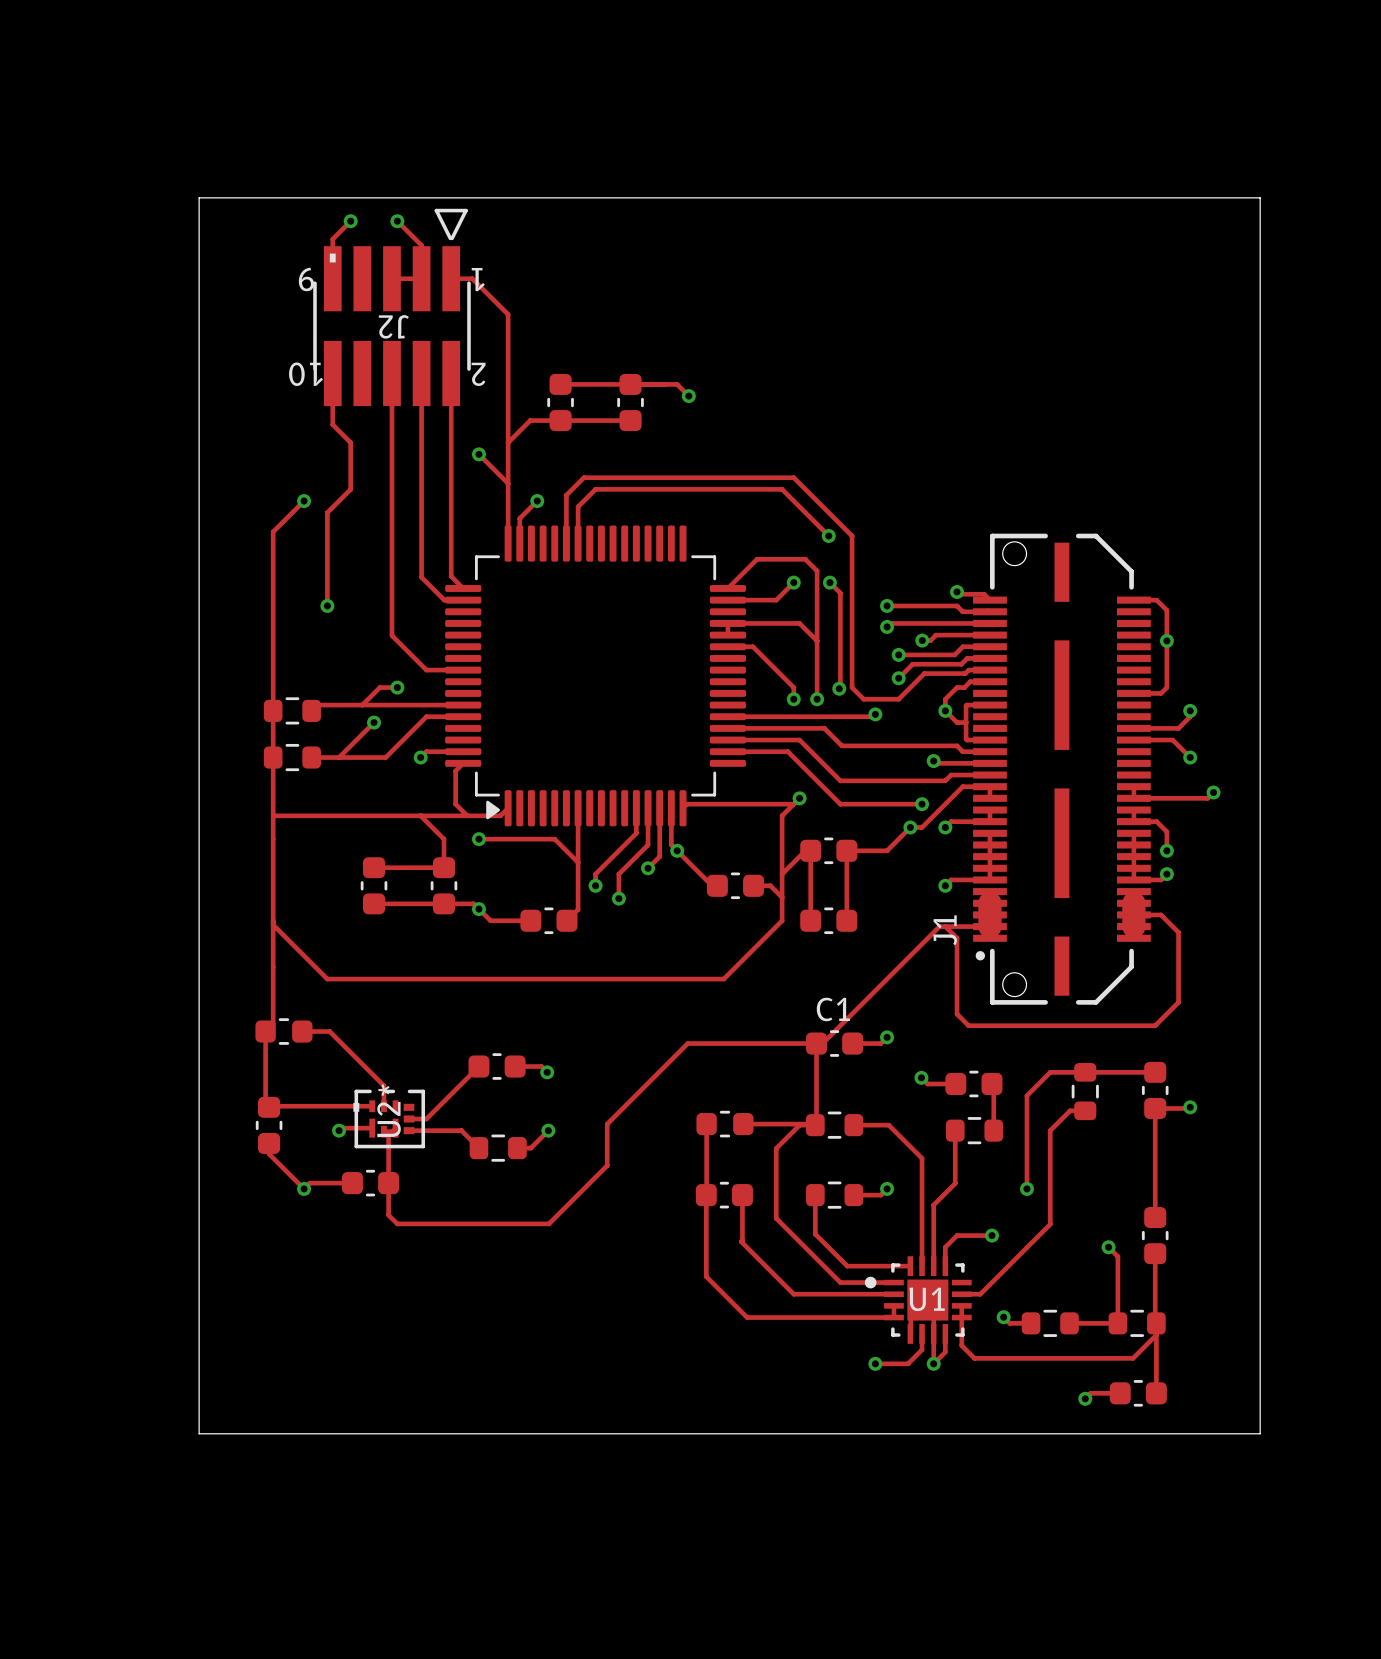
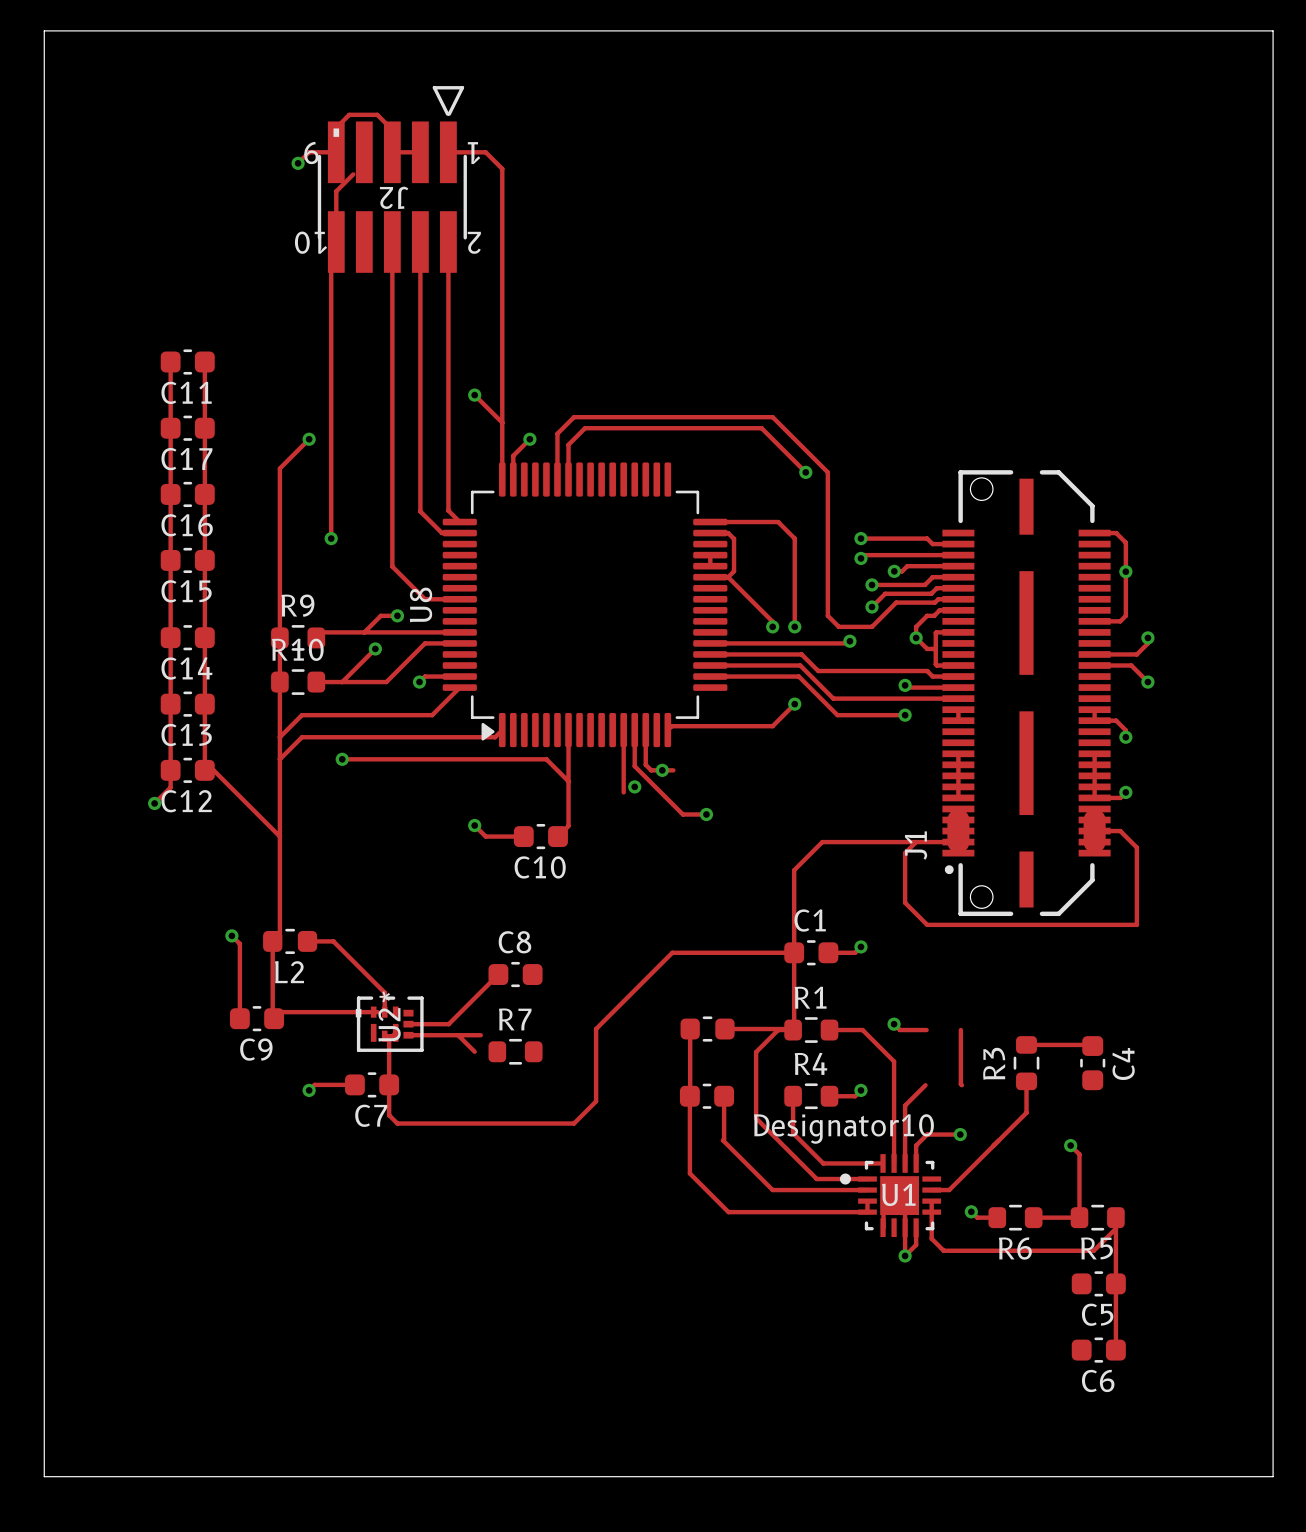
board edge: (199, 197) (1260, 197) (1260, 1433) (199, 1433) (199, 197) -> (44, 30) (44, 1476) (1273, 1476) (1273, 30) (44, 30)
track: none -> (420, 152) (392, 152) (392, 129) (377, 114) (349, 114) (336, 127) (336, 152) (309, 152) (298, 163)
via: none -> (298, 163)
via: (350, 221) -> none
track: (397, 221) (421, 245) (421, 278) (391, 278) -> none
via: (397, 221) -> none
track: (451, 278) (472, 278) (508, 314) -> (448, 152) (485, 152) (502, 168) (502, 262)
track: none -> (392, 242) (392, 318)
track: none -> (420, 242) (420, 318)
track: none -> (448, 242) (448, 318)
J2 position: (391, 307) -> (392, 179)
track: (332, 373) (332, 424) (350, 442) (350, 489) (327, 512) -> (336, 242) (331, 247) (331, 450)
track: (560, 384) (677, 384) (688, 396) -> none
via: (688, 396) -> none
part: (560, 402) -> none
part: (630, 402) -> none
track: none -> (170, 362) (170, 787) (154, 803)
C11: none -> (187, 362)
track: none -> (204, 362) (204, 770) (213, 770) (279, 836)
track: (630, 420) (530, 420) (508, 442) -> none
C17: none -> (187, 428)
C16: none -> (187, 494)
track: (793, 582) (776, 600) (746, 600) -> none
via: (793, 582) -> none
track: (829, 582) (840, 593) (839, 688) -> none
via: (829, 582) -> none
track: (727, 588) (757, 559) (805, 559) (817, 570) (817, 605) -> (710, 522) (778, 522) (794, 538)
track: (957, 591) (957, 594) (984, 594) (989, 600) -> none
via: (957, 591) -> none
track: (727, 623) (799, 623) (817, 640) -> none
C15: none -> (187, 560)
track: (746, 646) (752, 646) (793, 687) (793, 693) -> (728, 533) (734, 538) (734, 571) (728, 577) (772, 621)
R9 name: none -> R9 (297, 605)
U8 name: none -> U8 (421, 604)
via: (839, 688) -> none
C14: none -> (187, 637)
R10 name: none -> R10 (297, 649)
track: (799, 740) (840, 780) (945, 780) (951, 775) -> (778, 665) (800, 665) (833, 698) (921, 698)
track: (787, 751) (840, 804) (922, 804) -> (767, 676) (798, 676) (837, 715) (905, 715)
track: (455, 770) (455, 804) (467, 815) -> (452, 694) (432, 715) (301, 715) (279, 737)
C13: none -> (187, 704)
track: none -> (794, 704) (778, 720)
track: (989, 786) (962, 786) (922, 827) (910, 827) (887, 850) (846, 850) -> none
track: (1213, 792) (1207, 798) (1156, 798) -> (1125, 737) (1125, 730) (1116, 720)
via: (1213, 792) -> none
via position: (799, 798) -> (794, 704)
track: (793, 804) (782, 815) (782, 920) (723, 979) (327, 979) (273, 924) -> none
via position: (922, 804) -> (905, 715)
track: (671, 808) (671, 844) (712, 885) (717, 885) -> none
track: (989, 810) (989, 821) (951, 821) (945, 827) -> none
track: (1133, 810) (1133, 821) (1156, 821) (1166, 831) (1166, 850) -> none
track: (273, 815) (296, 815) -> (279, 759) (301, 737)
track: (420, 815) (443, 839) (443, 867) (374, 867) -> none
via: none -> (1125, 737)
via: (910, 827) -> none
via: (945, 827) -> none
track: (636, 833) (595, 874) (595, 885) -> (623, 753) (623, 792)
track: none -> (342, 759) (474, 759)
via: none -> (342, 759)
via: (478, 839) -> none
track: (648, 844) (618, 874) (618, 898) -> (634, 764) (682, 814) (706, 814)
track: (659, 844) (659, 856) (648, 868) -> (645, 764) (651, 770) (673, 770)
C12: none -> (187, 770)
part: (828, 850) -> none
track: (846, 850) (846, 909) -> none
via: (1166, 850) -> none
track: (782, 874) (805, 850) (810, 850) (810, 909) -> none
track: (989, 879) (951, 879) (945, 885) -> none
via: none -> (154, 803)
part: (374, 885) -> none
part: (443, 885) -> none
via: (595, 885) -> none
part: (735, 885) -> none
track: (753, 885) (770, 885) (782, 897) -> none
via: (945, 885) -> none
via: none -> (706, 814)
via: (618, 898) -> none
track: (374, 903) (473, 903) (478, 909) -> none
part: (828, 920) -> none
track: (939, 926) (822, 1043) (816, 1043) -> (910, 842) (822, 842) (794, 870) (794, 952)
track: (945, 926) (957, 938) (957, 1014) (968, 1025) (1155, 1025) (1178, 1002) -> (916, 842) (905, 853) (905, 902) (927, 924) (1136, 924) (1136, 913)
C10 name: none -> C10 (540, 867)
track: none -> (231, 935) (239, 943) (239, 1018)
via: none -> (231, 935)
L2 name: none -> L2 (289, 972)
track: (478, 1066) (426, 1118) -> (498, 974) (448, 1024) (425, 1024)
part: (497, 1066) -> none
track: (515, 1066) (541, 1066) (547, 1072) -> none
C8: none -> (515, 974)
via: (547, 1072) -> none
track: (1155, 1072) (1050, 1072) (1026, 1095) (1026, 1188) -> none
track: (921, 1077) (927, 1084) (955, 1084) -> (894, 1024) (899, 1030) (926, 1030)
via position: (921, 1077) -> (894, 1024)
part: (973, 1084) -> none
track: (991, 1084) (993, 1085) (993, 1130) -> none
R1 name: none -> R1 (810, 997)
part: (1155, 1090) -> none
part: (1085, 1091) -> none
track: (1190, 1107) (1155, 1108) (1155, 1217) -> none
via: (1190, 1107) -> none
track: (1085, 1110) (1070, 1110) (1050, 1130) (1050, 1224) -> (1026, 1081) (1026, 1112) (1015, 1123)
C9: none -> (257, 1018)
part: (269, 1125) -> none
track: none -> (960, 1030) (961, 1085)
track: (372, 1128) (341, 1128) (339, 1130) -> none
via: (339, 1130) -> none
track: (548, 1130) (530, 1148) (517, 1148) -> none
via: (548, 1130) -> none
track: (955, 1130) (955, 1183) -> none
part: (974, 1130) -> none
track: none -> (1027, 1046) (1026, 1044) (1092, 1046)
track: (269, 1143) (269, 1153) (304, 1188) -> none
part: (498, 1148) -> none
R7: none -> (515, 1051)
R4 name: none -> R4 (810, 1063)
R3: none -> (1026, 1063)
C4: none -> (1092, 1063)
track: (607, 1165) (548, 1223) -> (596, 1068) (596, 1101) (574, 1123) (540, 1123)
via: (1026, 1188) -> none
C7 name: none -> C7 (371, 1115)
U1 text: none -> Designator10 (843, 1128)
part: (1155, 1235) -> none
track: (1155, 1253) (1156, 1323) -> none
track: (922, 1333) (922, 1349) (908, 1363) (875, 1363) -> none
R5 name: none -> R5 (1097, 1248)
R6 name: none -> R6 (1015, 1248)
via: (875, 1363) -> none
track: (1120, 1393) (1090, 1393) (1085, 1398) -> none
track: none -> (1115, 1283) (1115, 1350)
via: (1085, 1398) -> none
C5 name: none -> C5 (1097, 1314)
C6: none -> (1098, 1350)

